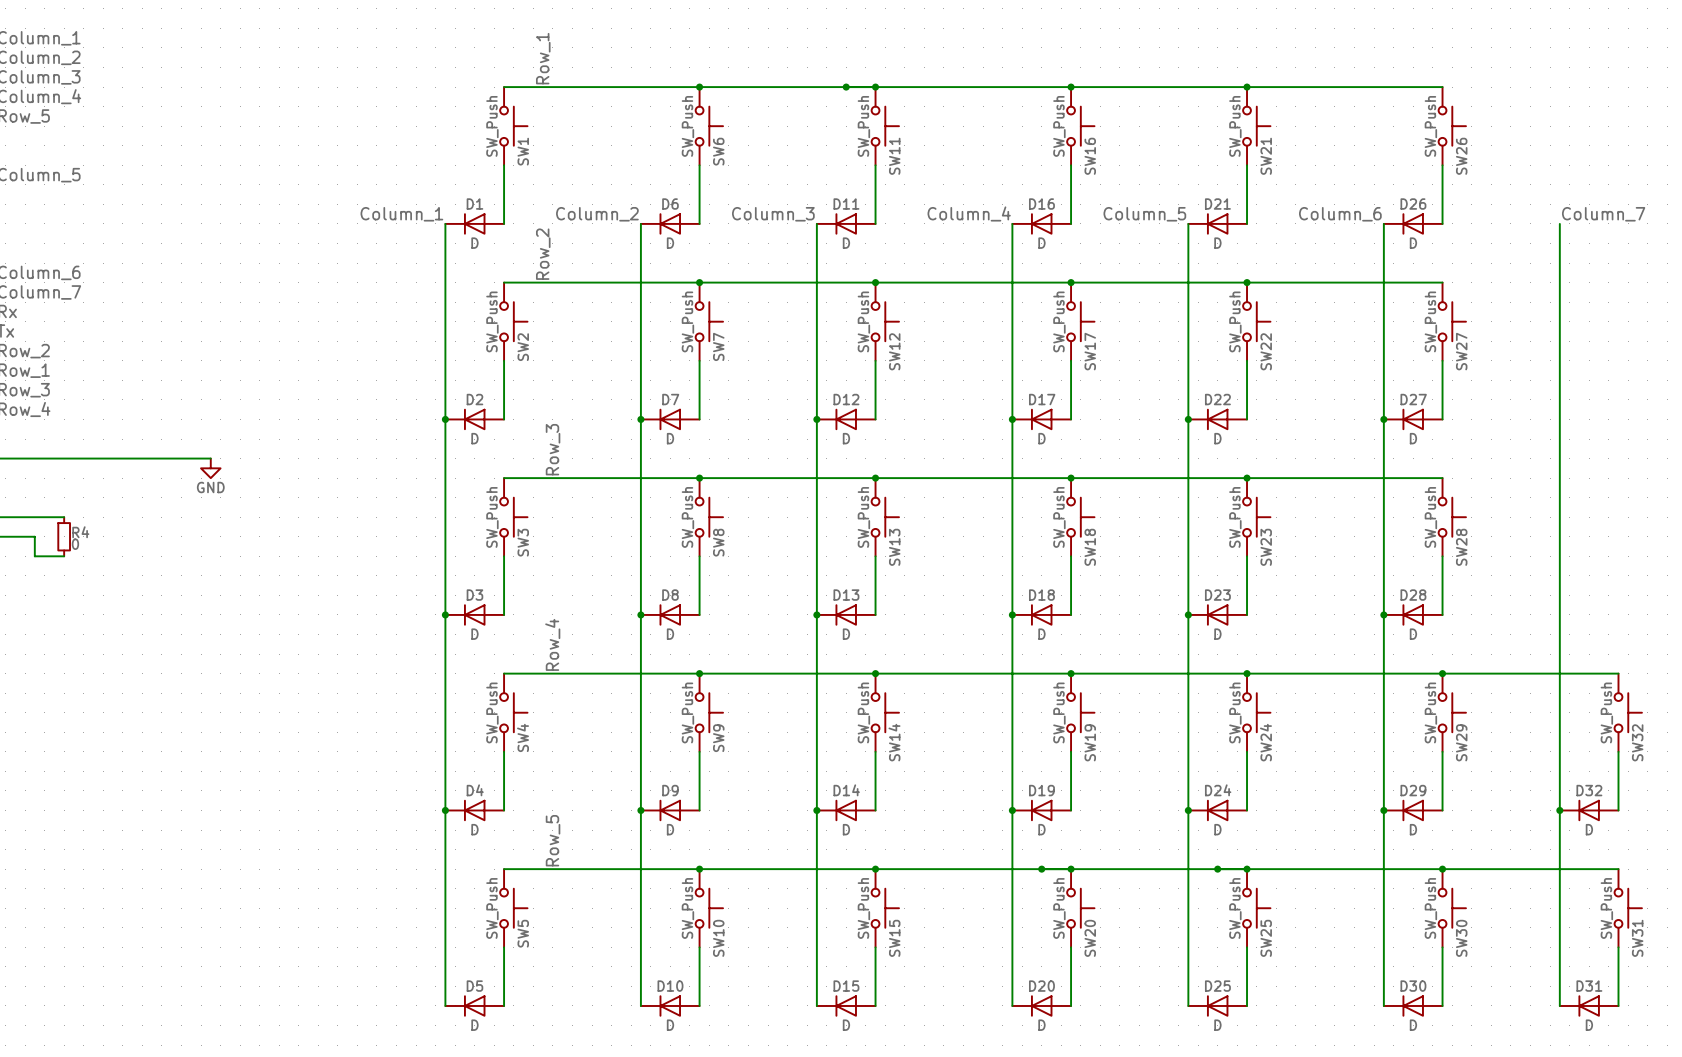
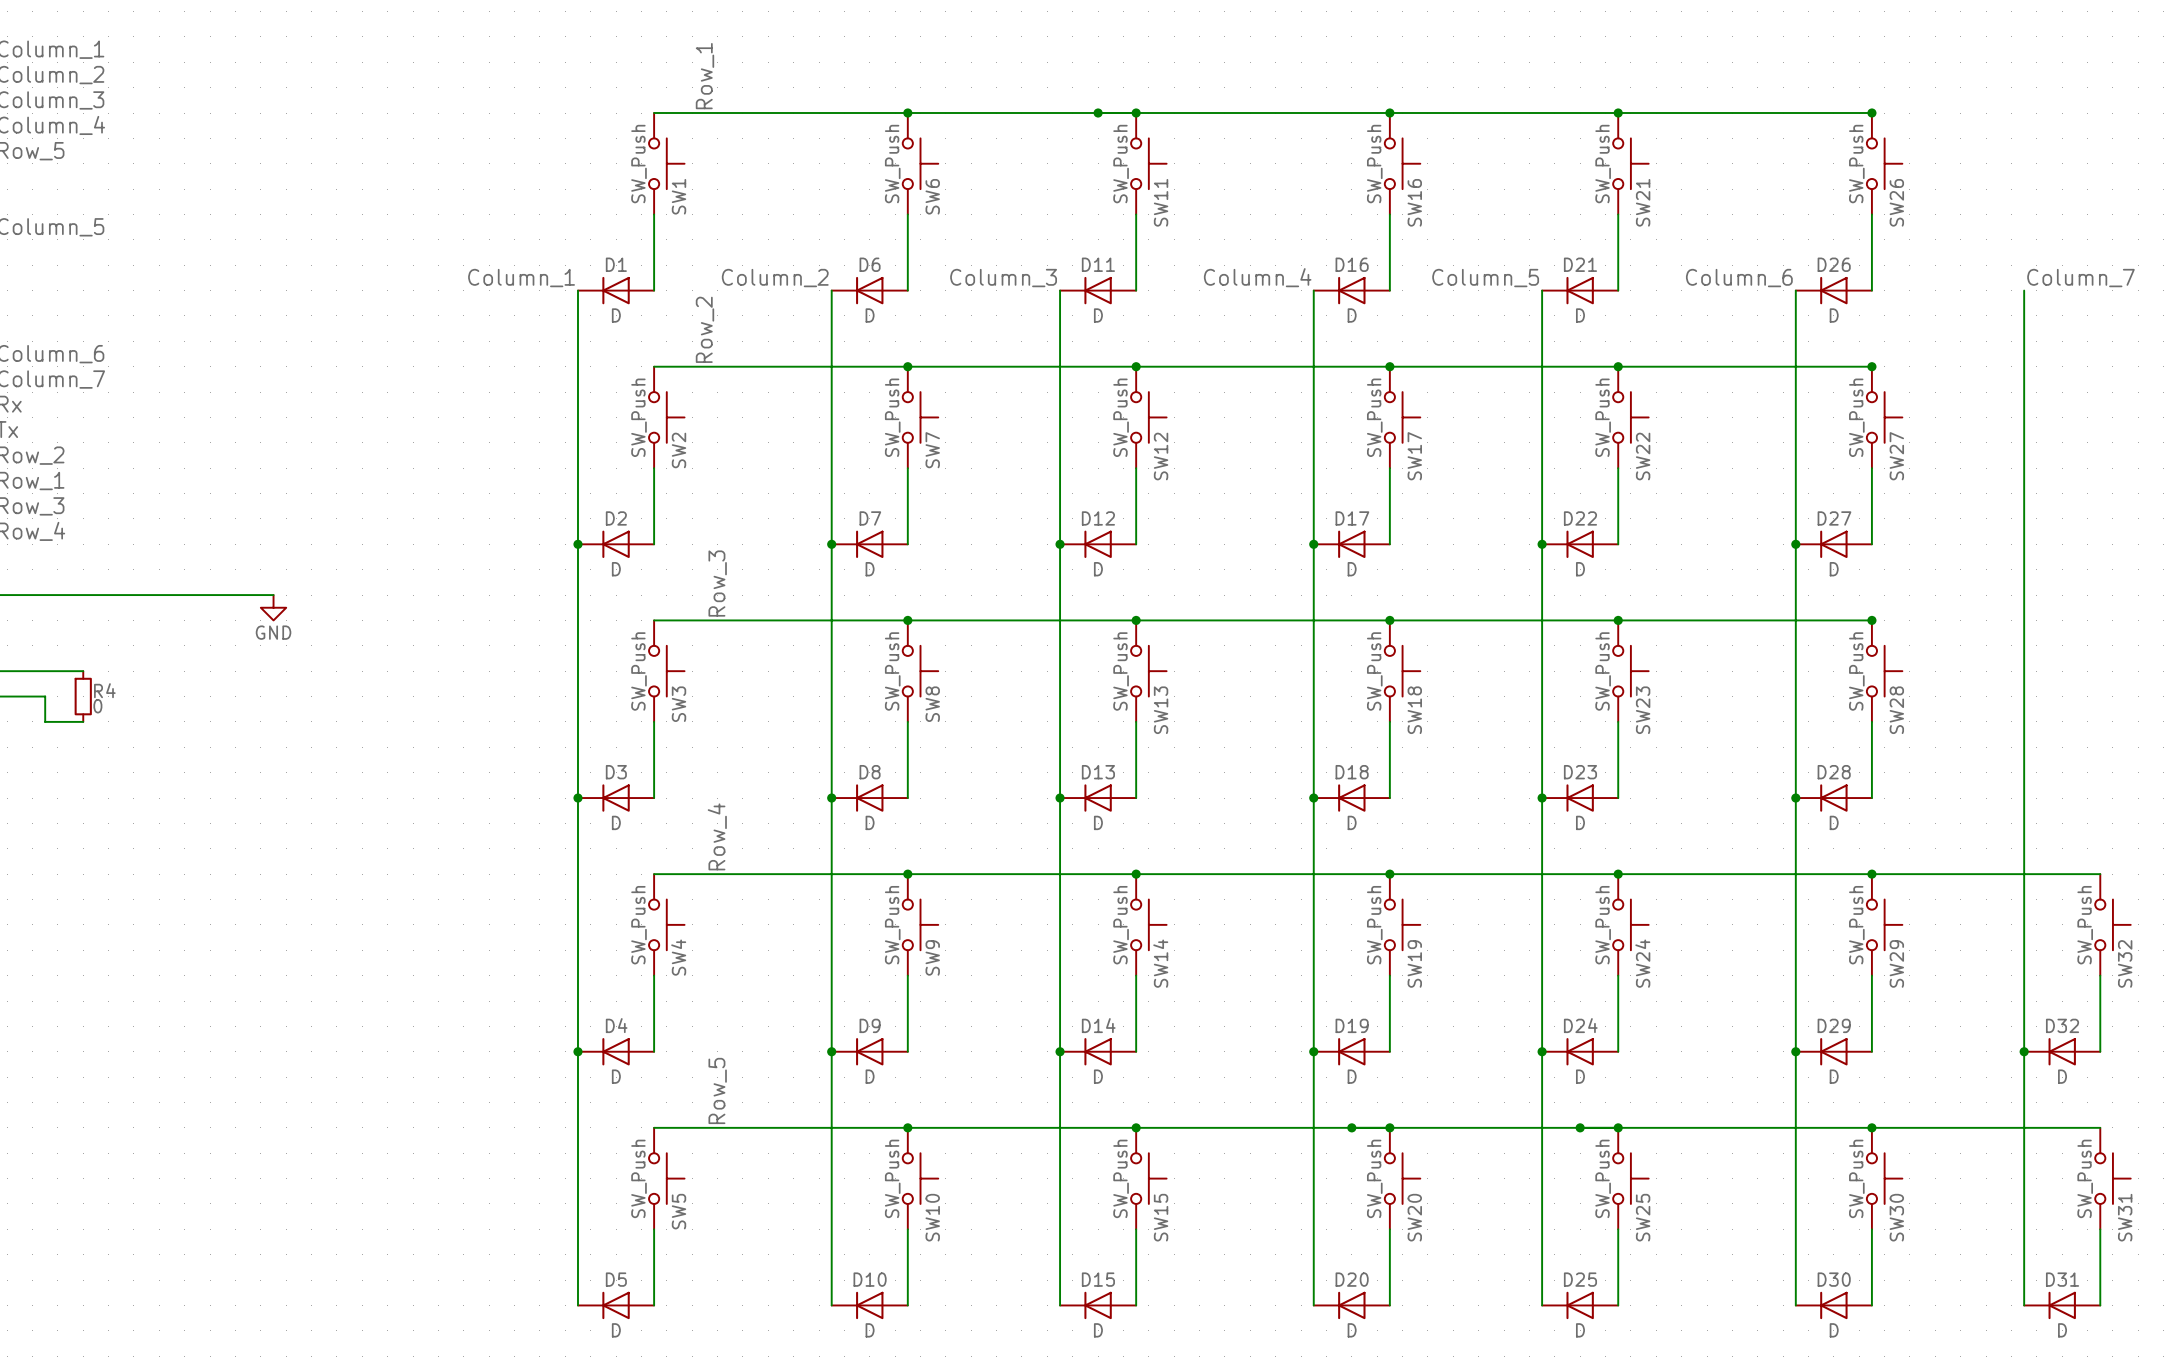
junction: none -> (1871, 113)
junction: none -> (1871, 366)
junction: none -> (1871, 620)

